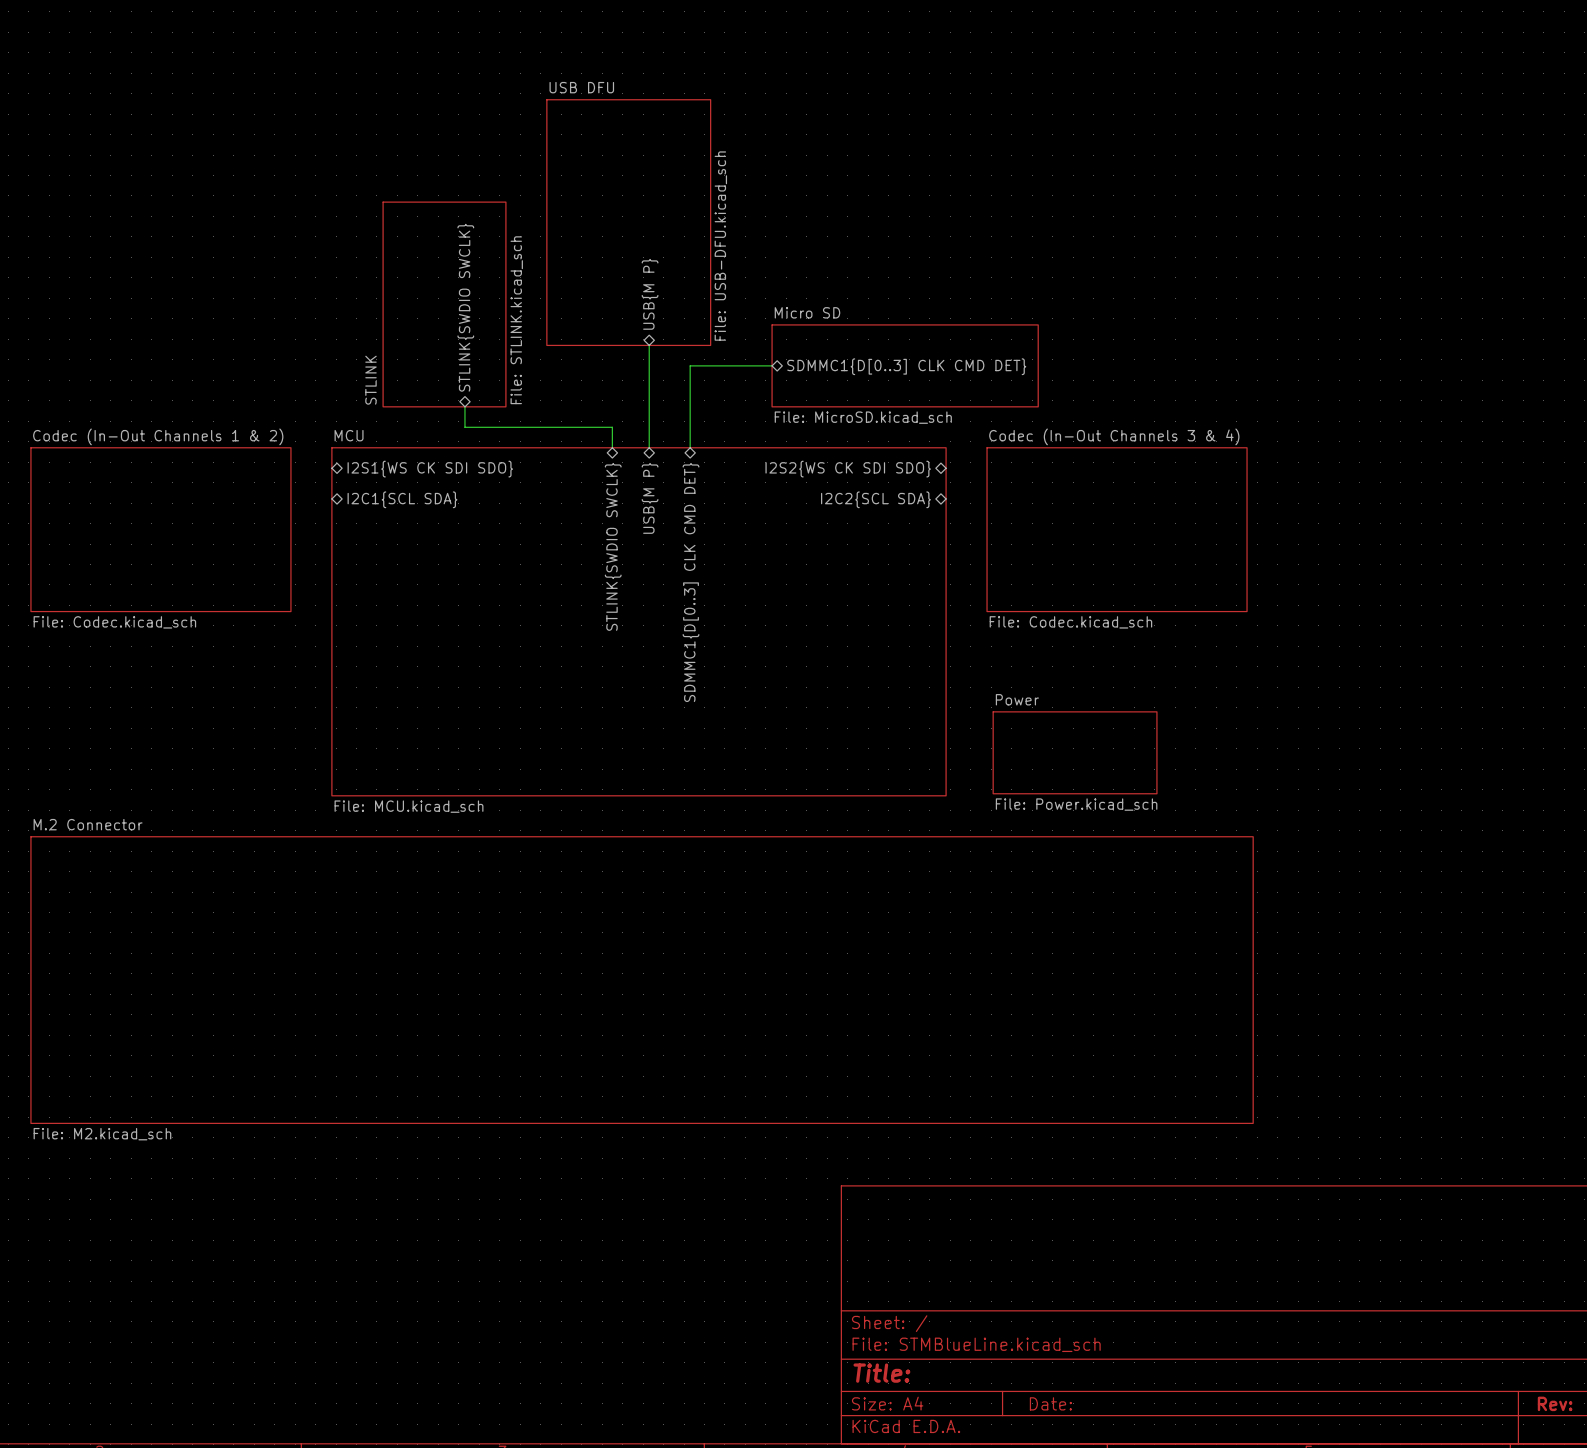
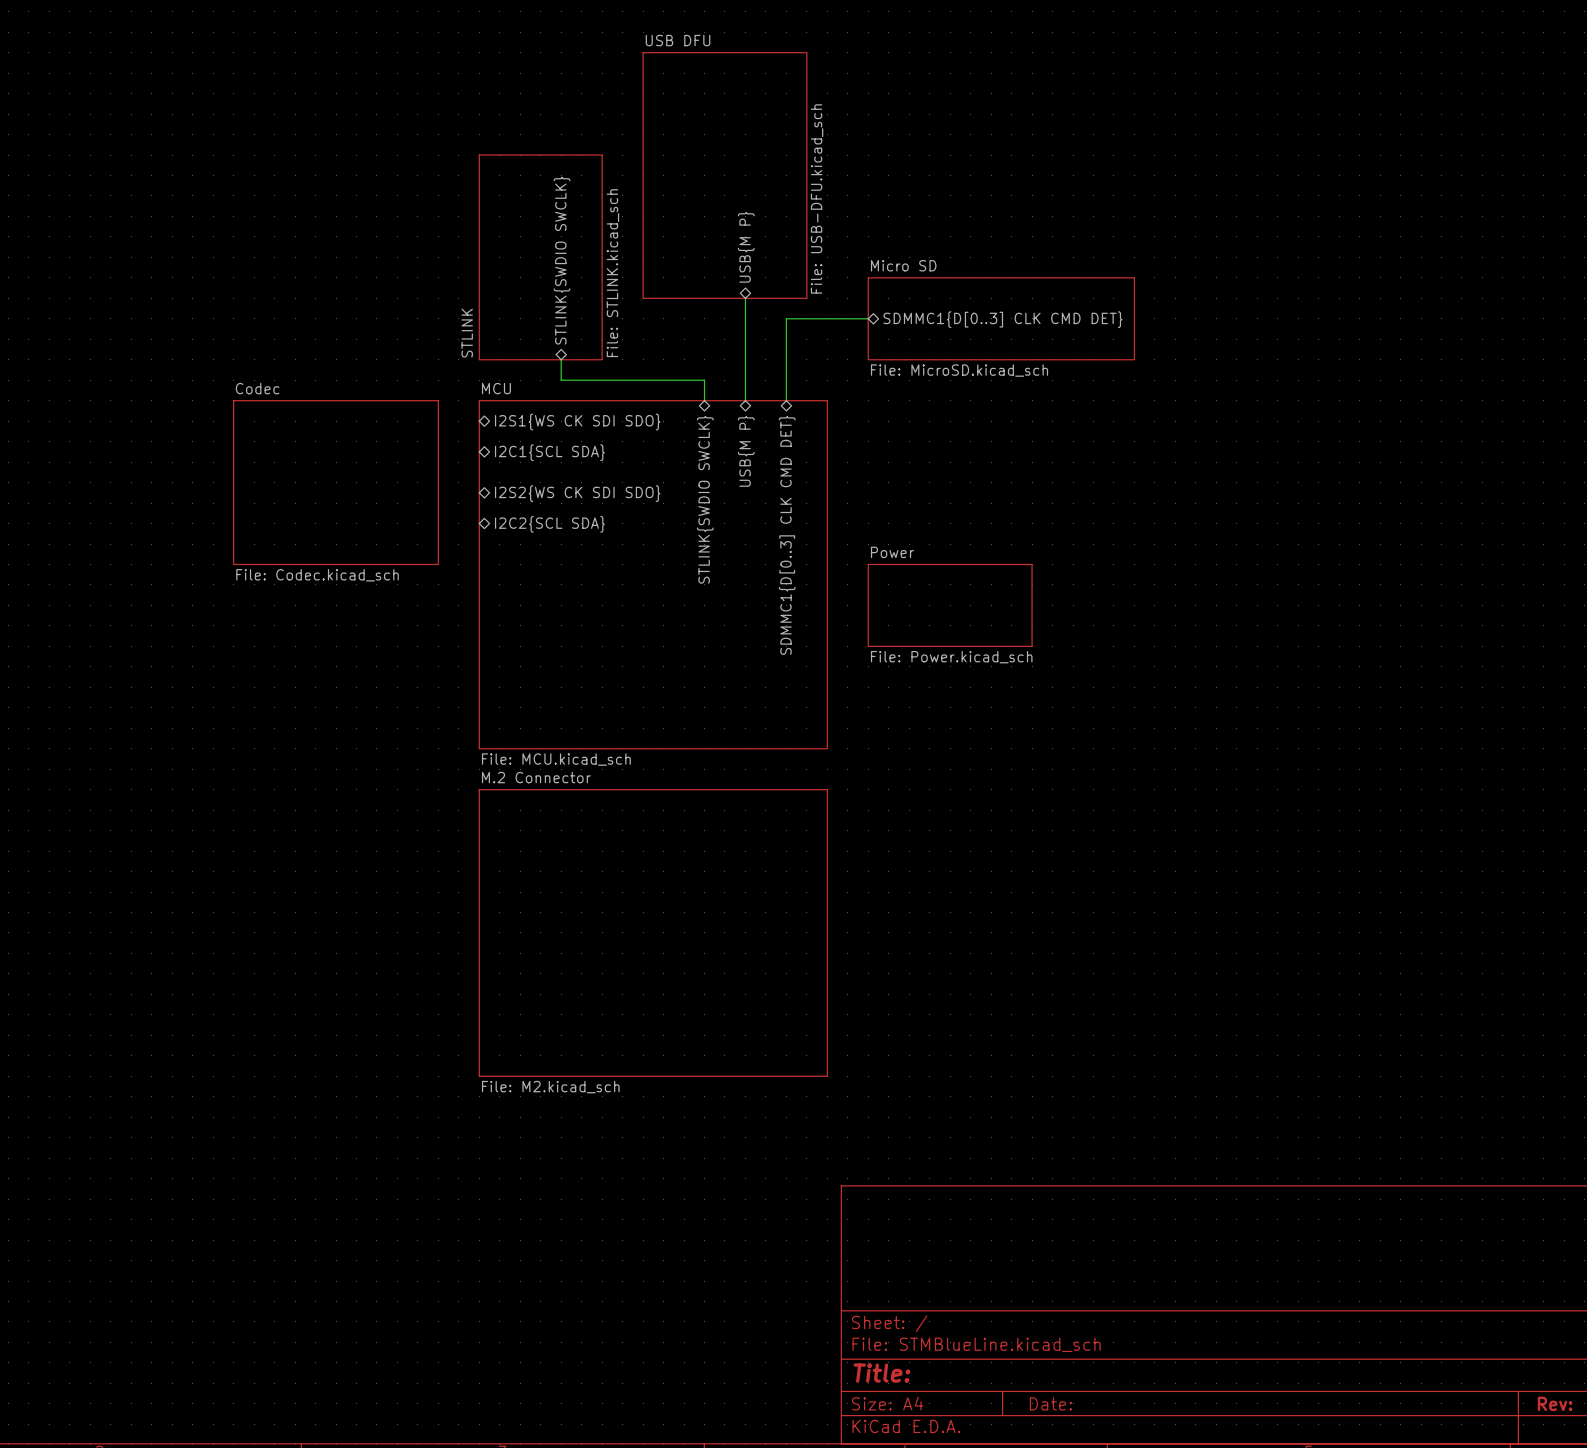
sheet USB DFU position: (628, 222) -> (724, 175)
sheet pin: none -> USB{M P} (746, 247)
sheet pin: none -> STLINK{SWDIO SWCLK} (562, 260)
sheet pin: USB{M P} (650, 294) -> none
sheet STLINK position: (444, 304) -> (540, 257)
sheet pin: STLINK{SWDIO SWCLK} (465, 307) -> none
sheet pin: none -> SDMMC1{D[0..3] CLK CMD DET} (1002, 319)
wire: (649, 345) (649, 447) -> (745, 298) (745, 400)
wire: none -> (561, 359) (561, 380) (704, 380) (704, 400)
wire: (772, 365) (690, 365) (690, 447) -> (868, 318) (786, 318) (786, 400)
sheet Micro SD position: (905, 365) -> (1001, 318)
sheet pin rotation: 0° (906, 366) -> 90° clockwise (787, 535)
wire: (464, 406) (464, 427) (612, 427) (612, 447) -> none
sheet pin: none -> USB{M P} (746, 451)
sheet pin position: I2S1{WS CK SDI SDO} (430, 469) -> I2S1{WS CK SDI SDO} (577, 422)
sheet pin: I2S2{WS CK SDI SDO} (848, 469) -> none
sheet Codec: none -> File: Codec.kicad_sch (336, 482)
sheet pin: none -> I2S2{WS CK SDI SDO} (577, 493)
sheet pin: USB{M P} (650, 498) -> none
sheet pin position: I2C1{SCL SDA} (402, 499) -> I2C1{SCL SDA} (549, 452)
sheet pin: none -> STLINK{SWDIO SWCLK} (705, 499)
sheet pin: I2C2{SCL SDA} (875, 499) -> none
sheet pin: none -> I2C2{SCL SDA} (549, 524)
sheet Codec (In-Out Channels 1 & 2): File: Codec.kicad_sch (160, 529) -> none
sheet Codec (In-Out Channels 3 & 4): File: Codec.kicad_sch (1117, 529) -> none
sheet pin: STLINK{SWDIO SWCLK} (613, 546) -> none
sheet MCU: none -> File: MCU.kicad_sch (653, 574)
sheet pin: SDMMC1{D[0..3] CLK CMD DET} (691, 582) -> none
sheet MCU: File: MCU.kicad_sch (638, 621) -> none
sheet Power position: (1075, 752) -> (950, 605)
sheet M.2 Connector name position: M.2 Connector (88, 824) -> M.2 Connector (536, 777)
sheet M.2 Connector shape: [30, 836, 1254, 1124] -> [478, 789, 828, 1077]
sheet M.2 Connector value position: File: M2.kicad_sch (102, 1134) -> File: M2.kicad_sch (550, 1087)

